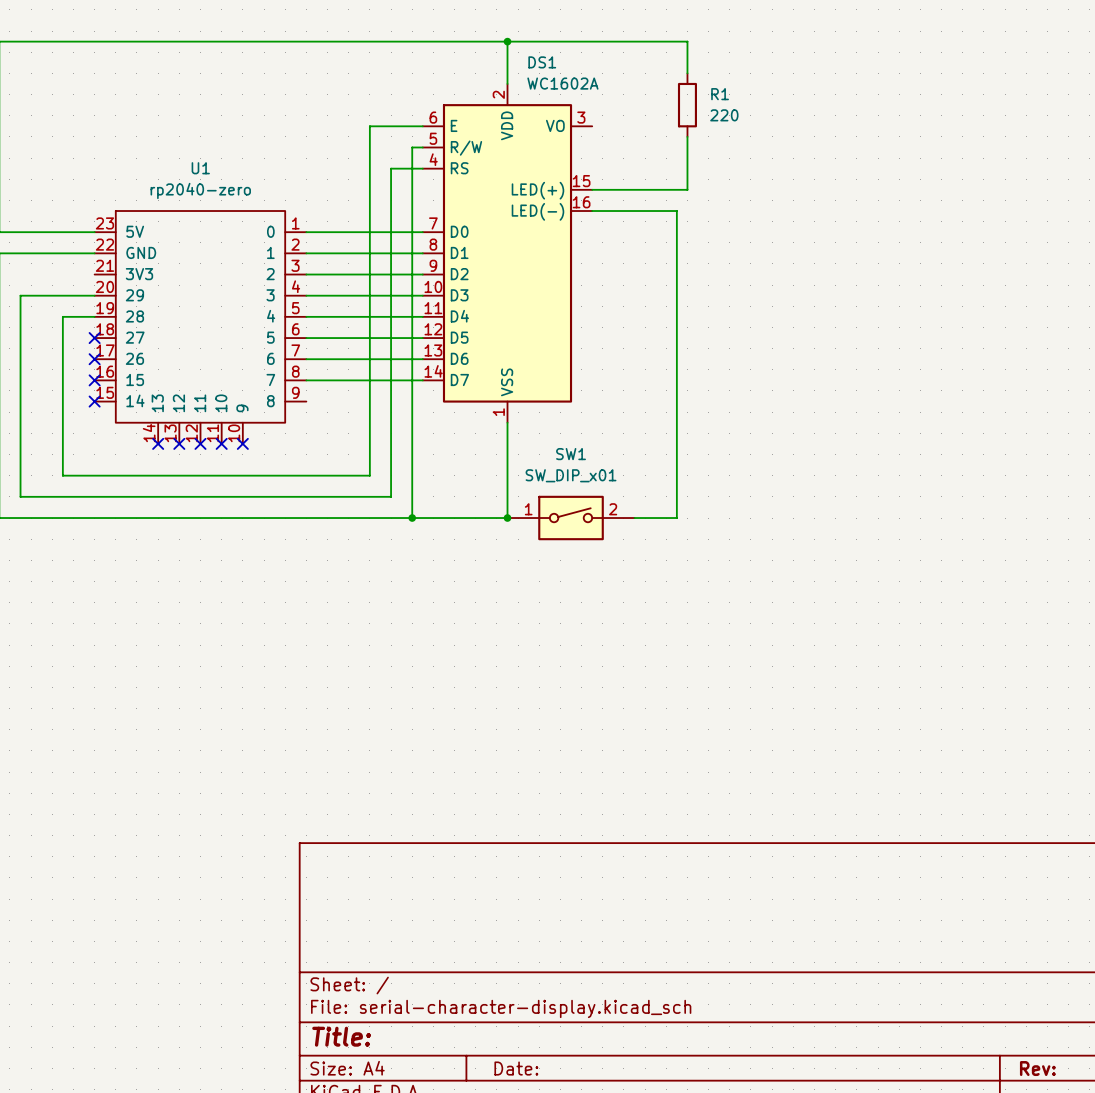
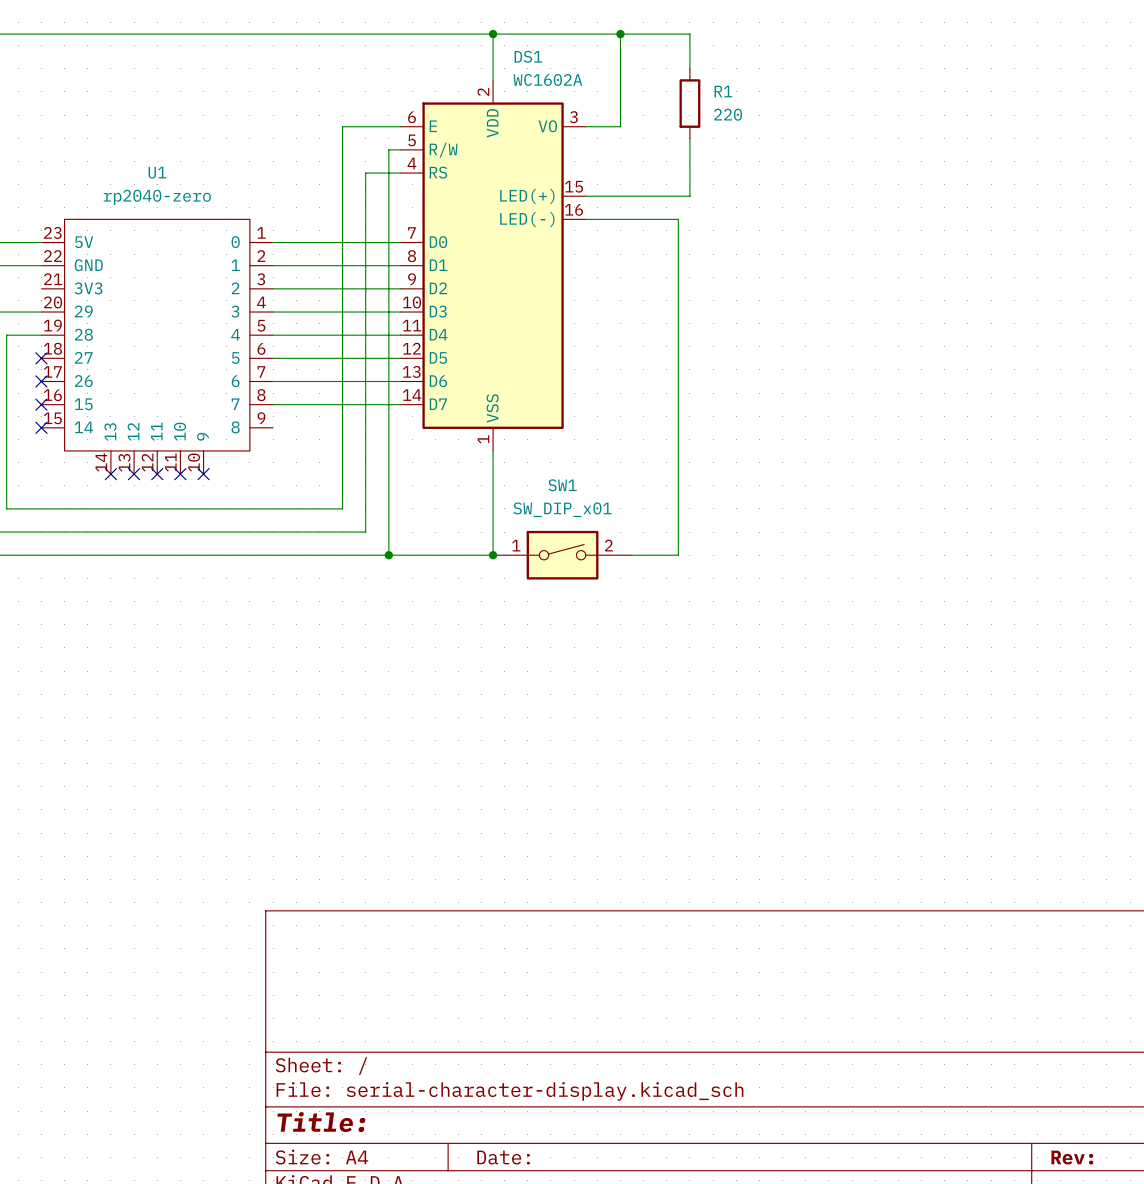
wire: none -> (620, 34) (620, 126) (585, 126)
junction: none -> (620, 34)

